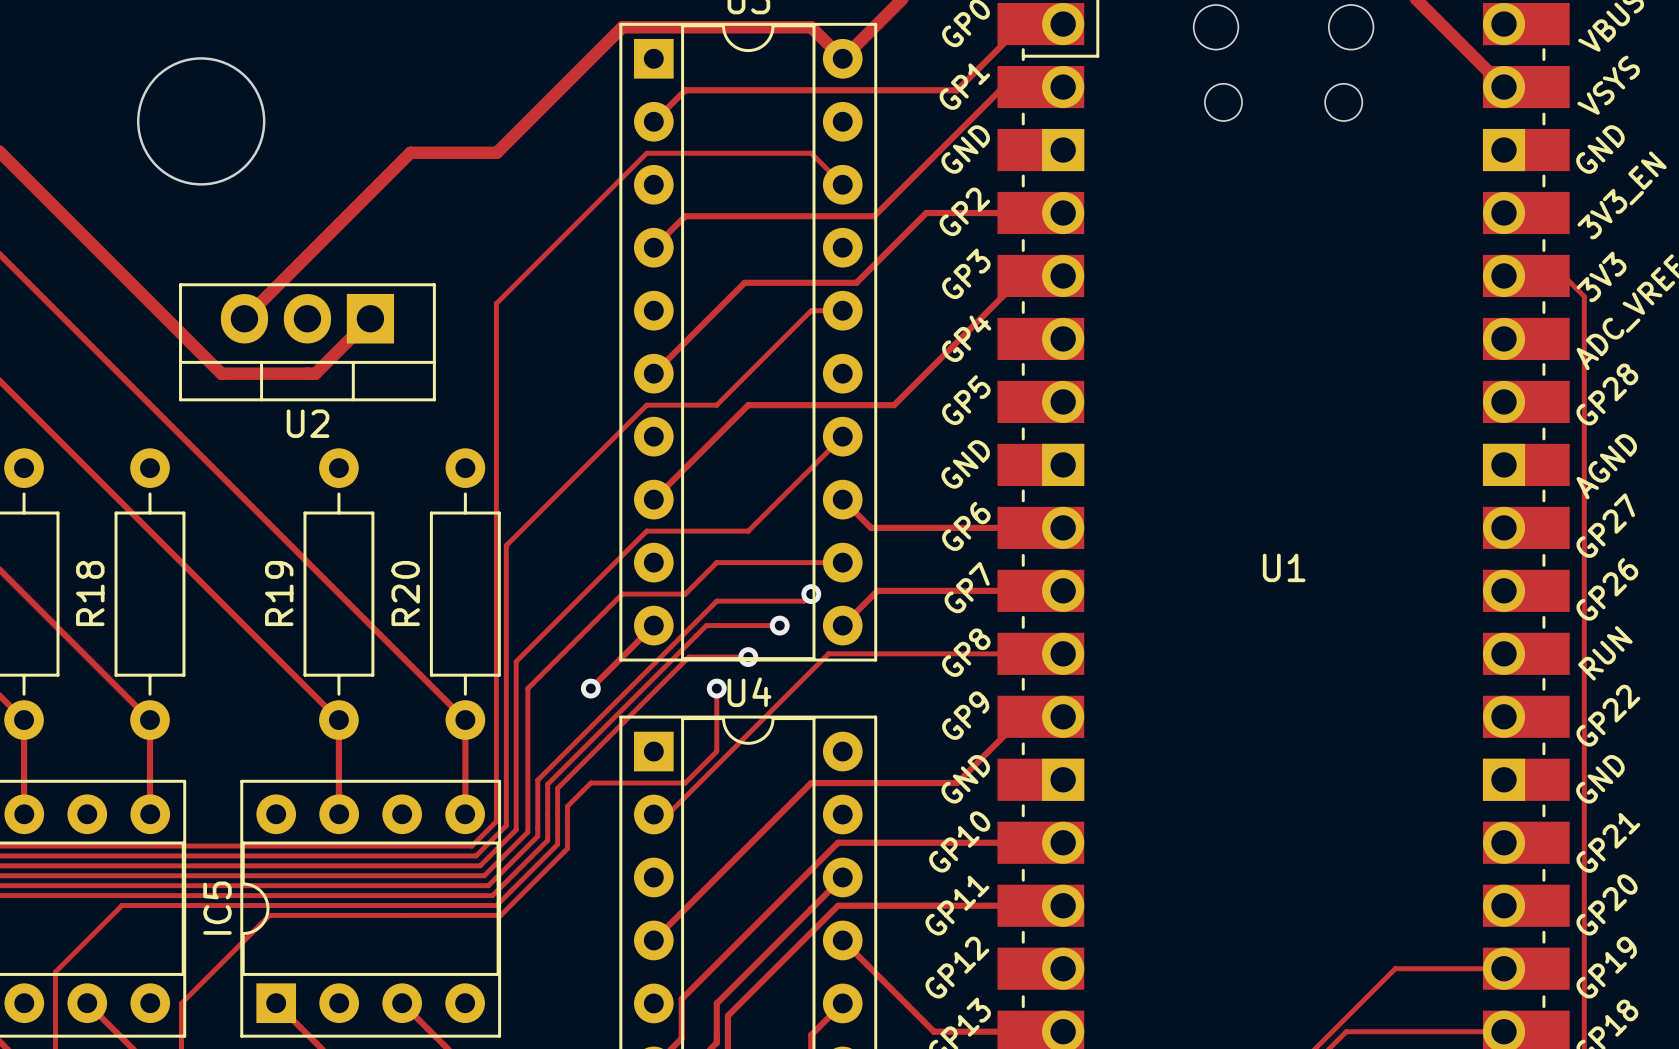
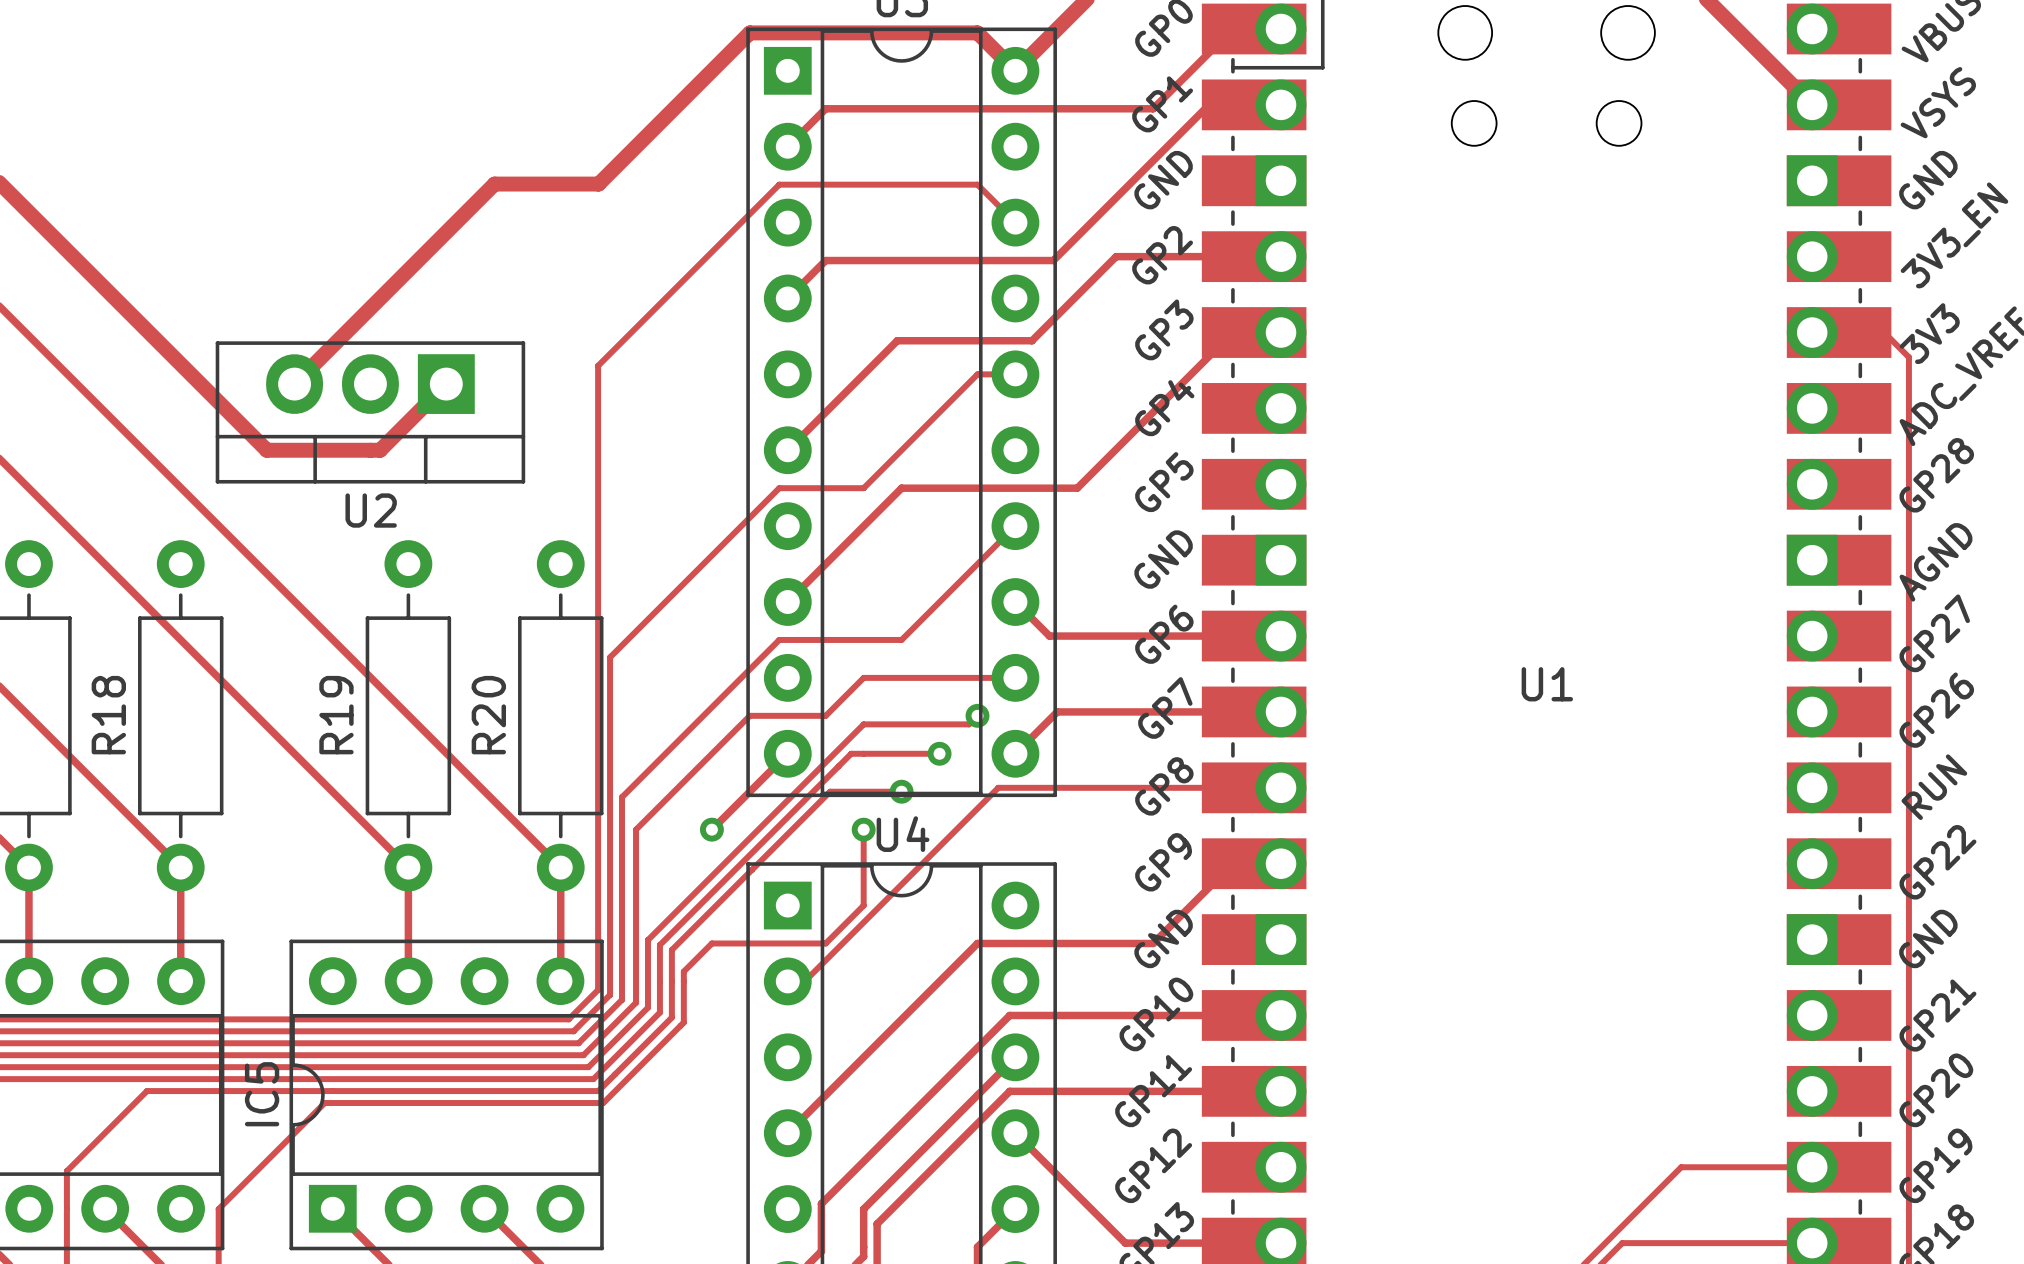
round board edge: [136, 57, 266, 186] -> none

